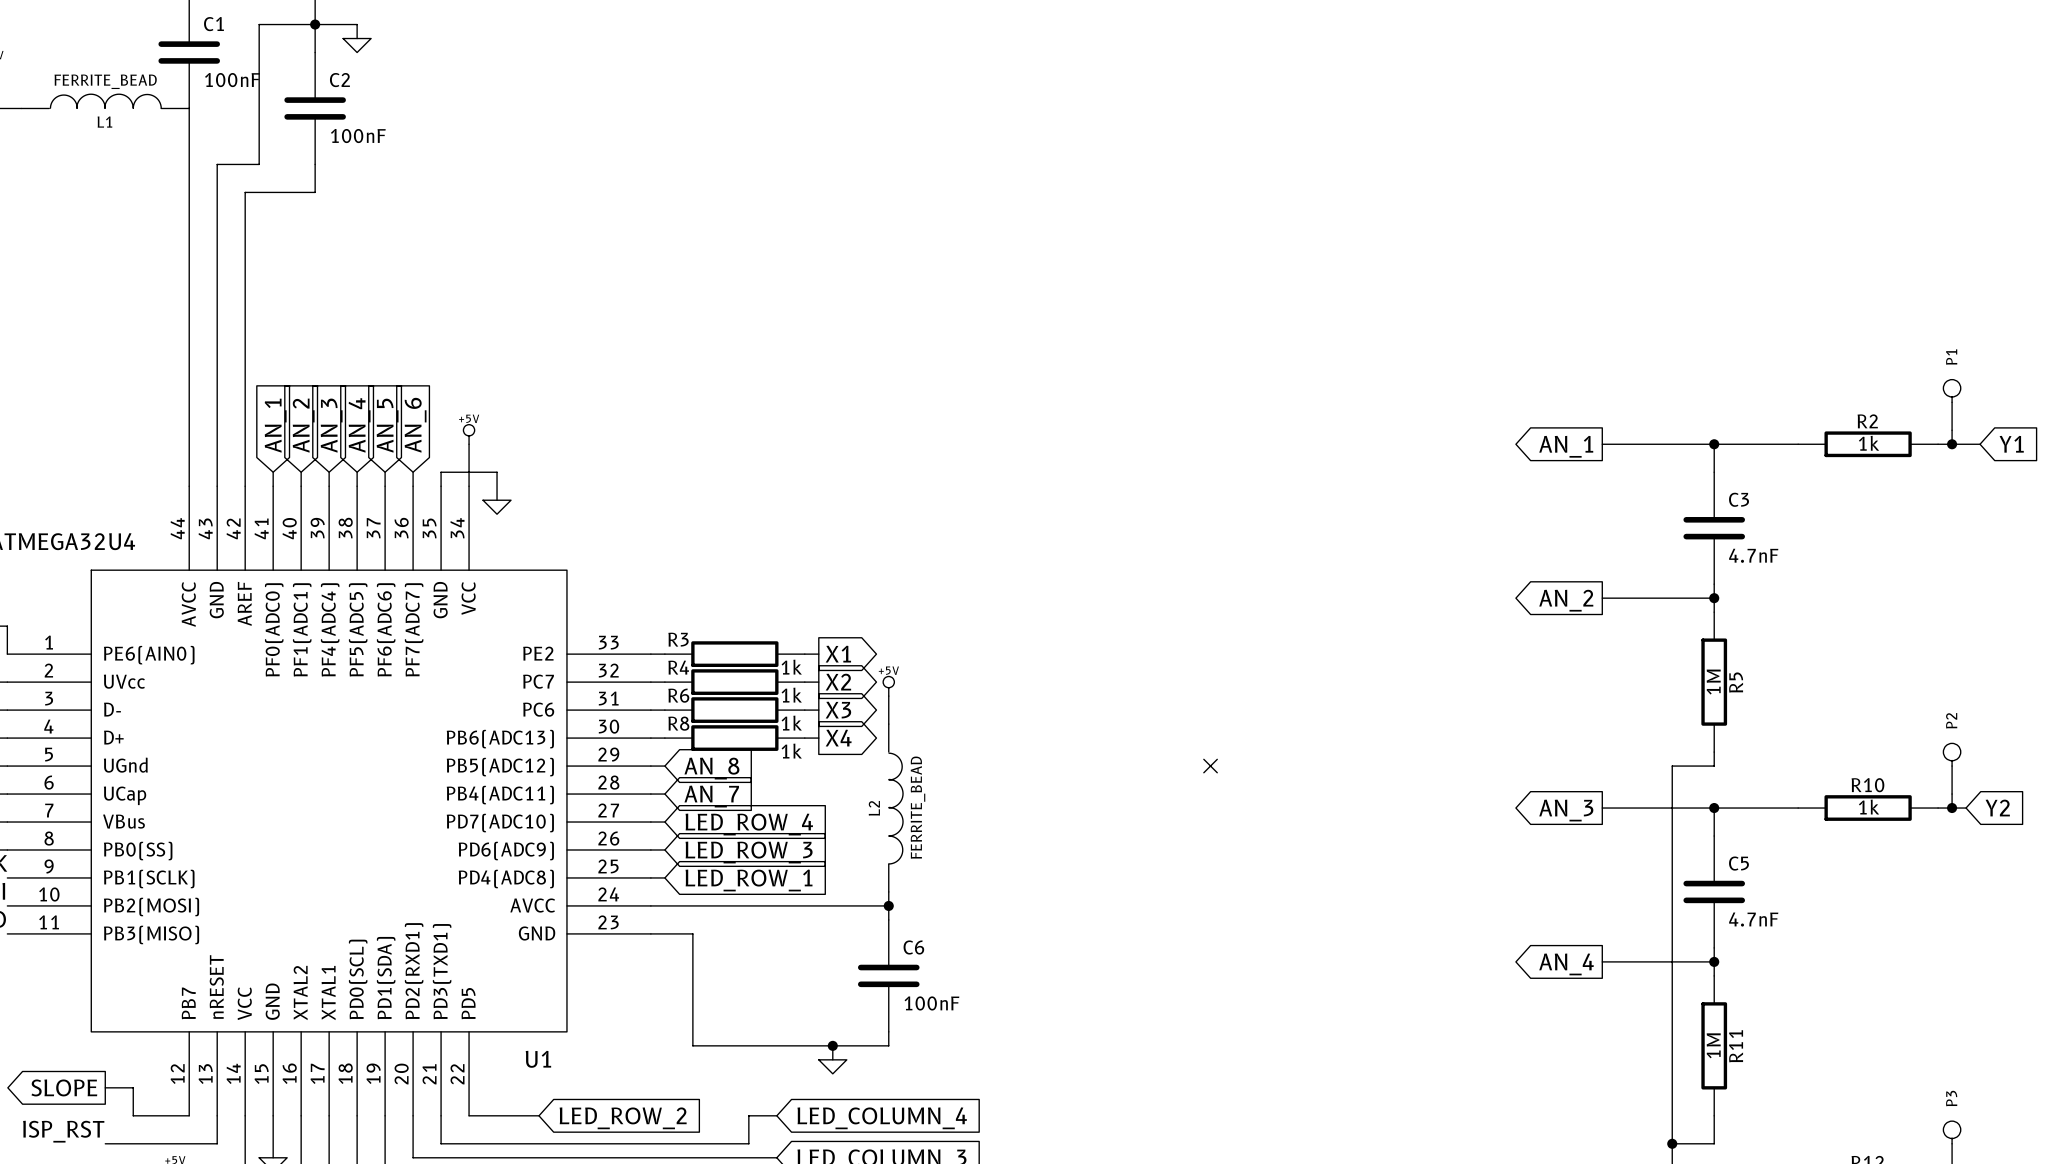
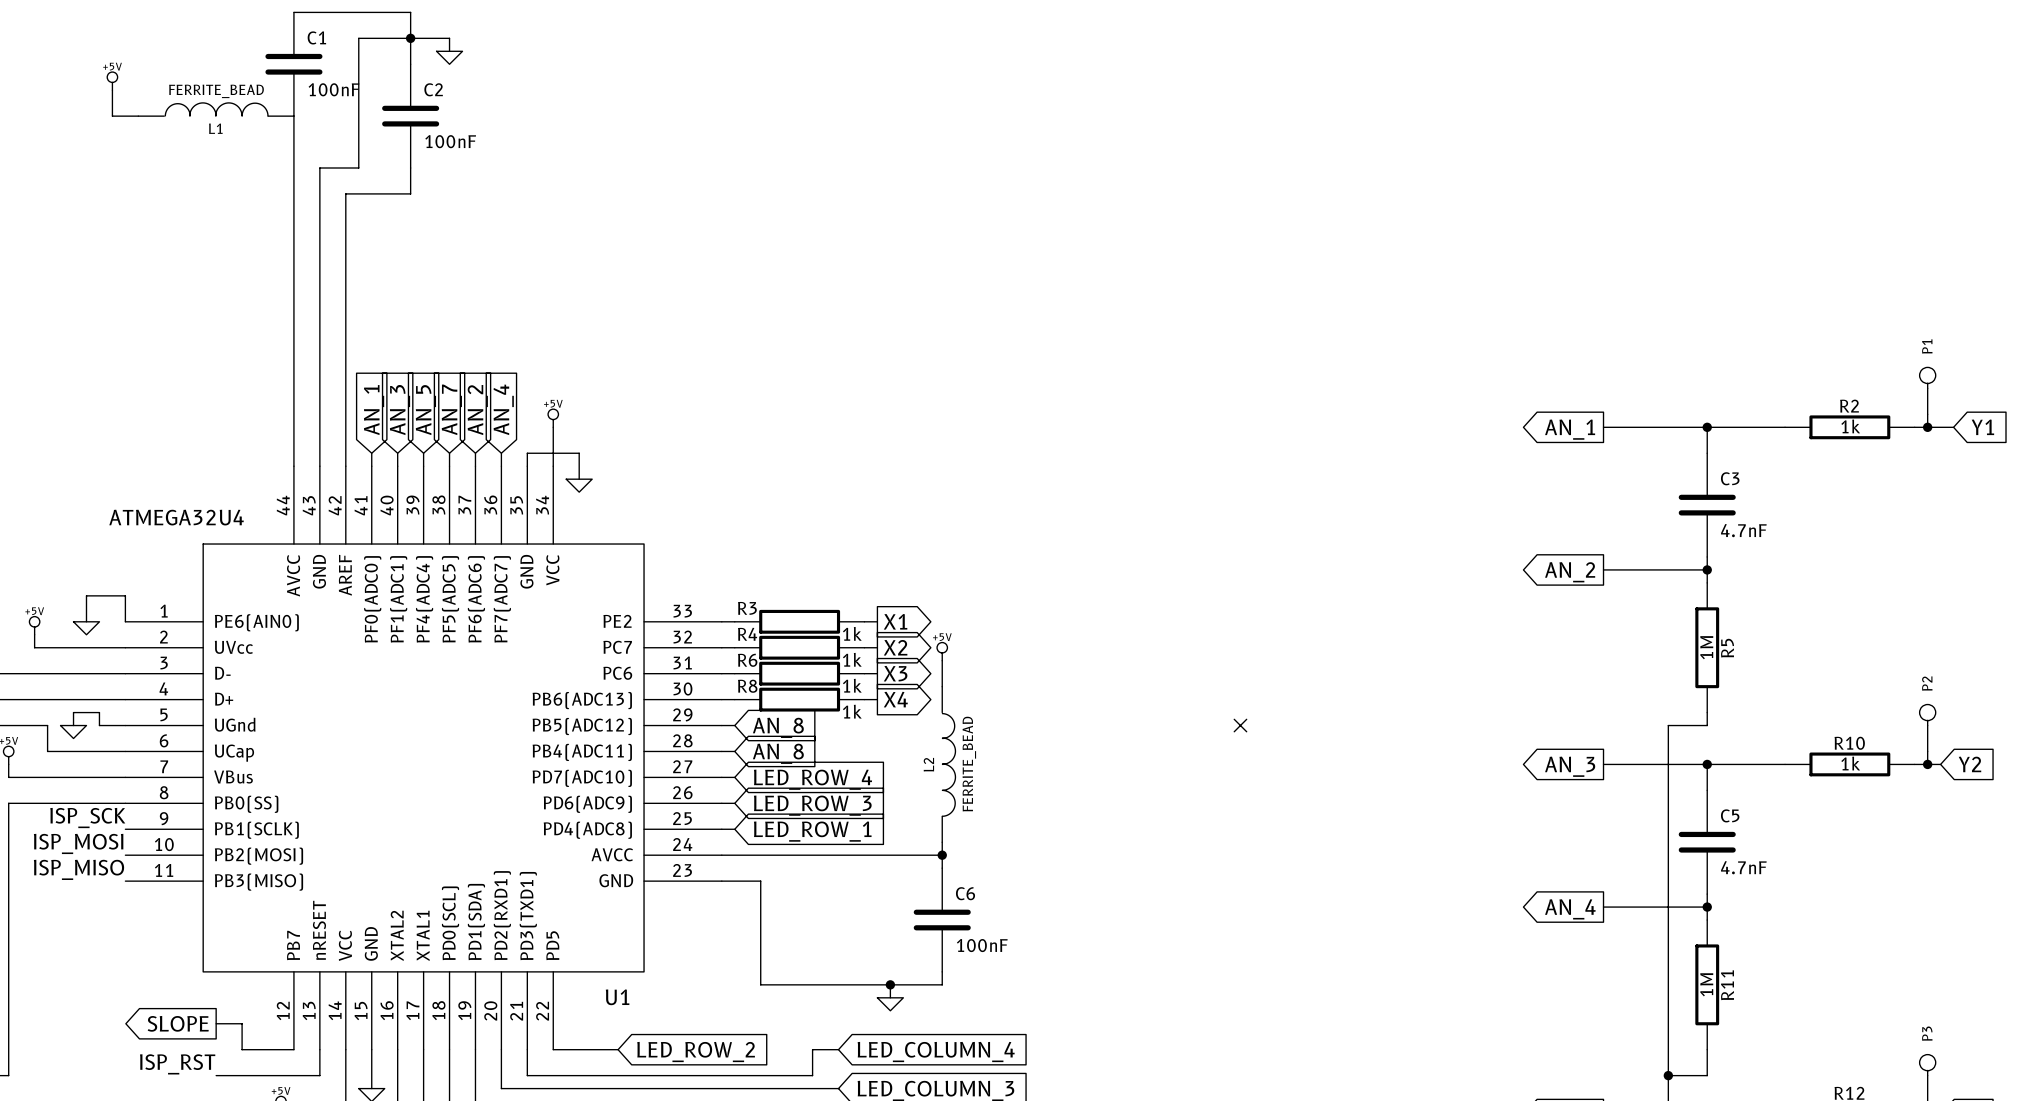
global label: AN_2 (303, 425) -> AN_3 (400, 410)
global label: AN_3 (331, 425) -> AN_5 (425, 410)
global label: AN_4 (359, 425) -> AN_7 (451, 409)
global label: AN_5 (387, 425) -> AN_2 (477, 410)
global label: AN_6 (415, 425) -> AN_4 (503, 409)
global label: AN_7 (711, 796) -> AN_8 (778, 753)

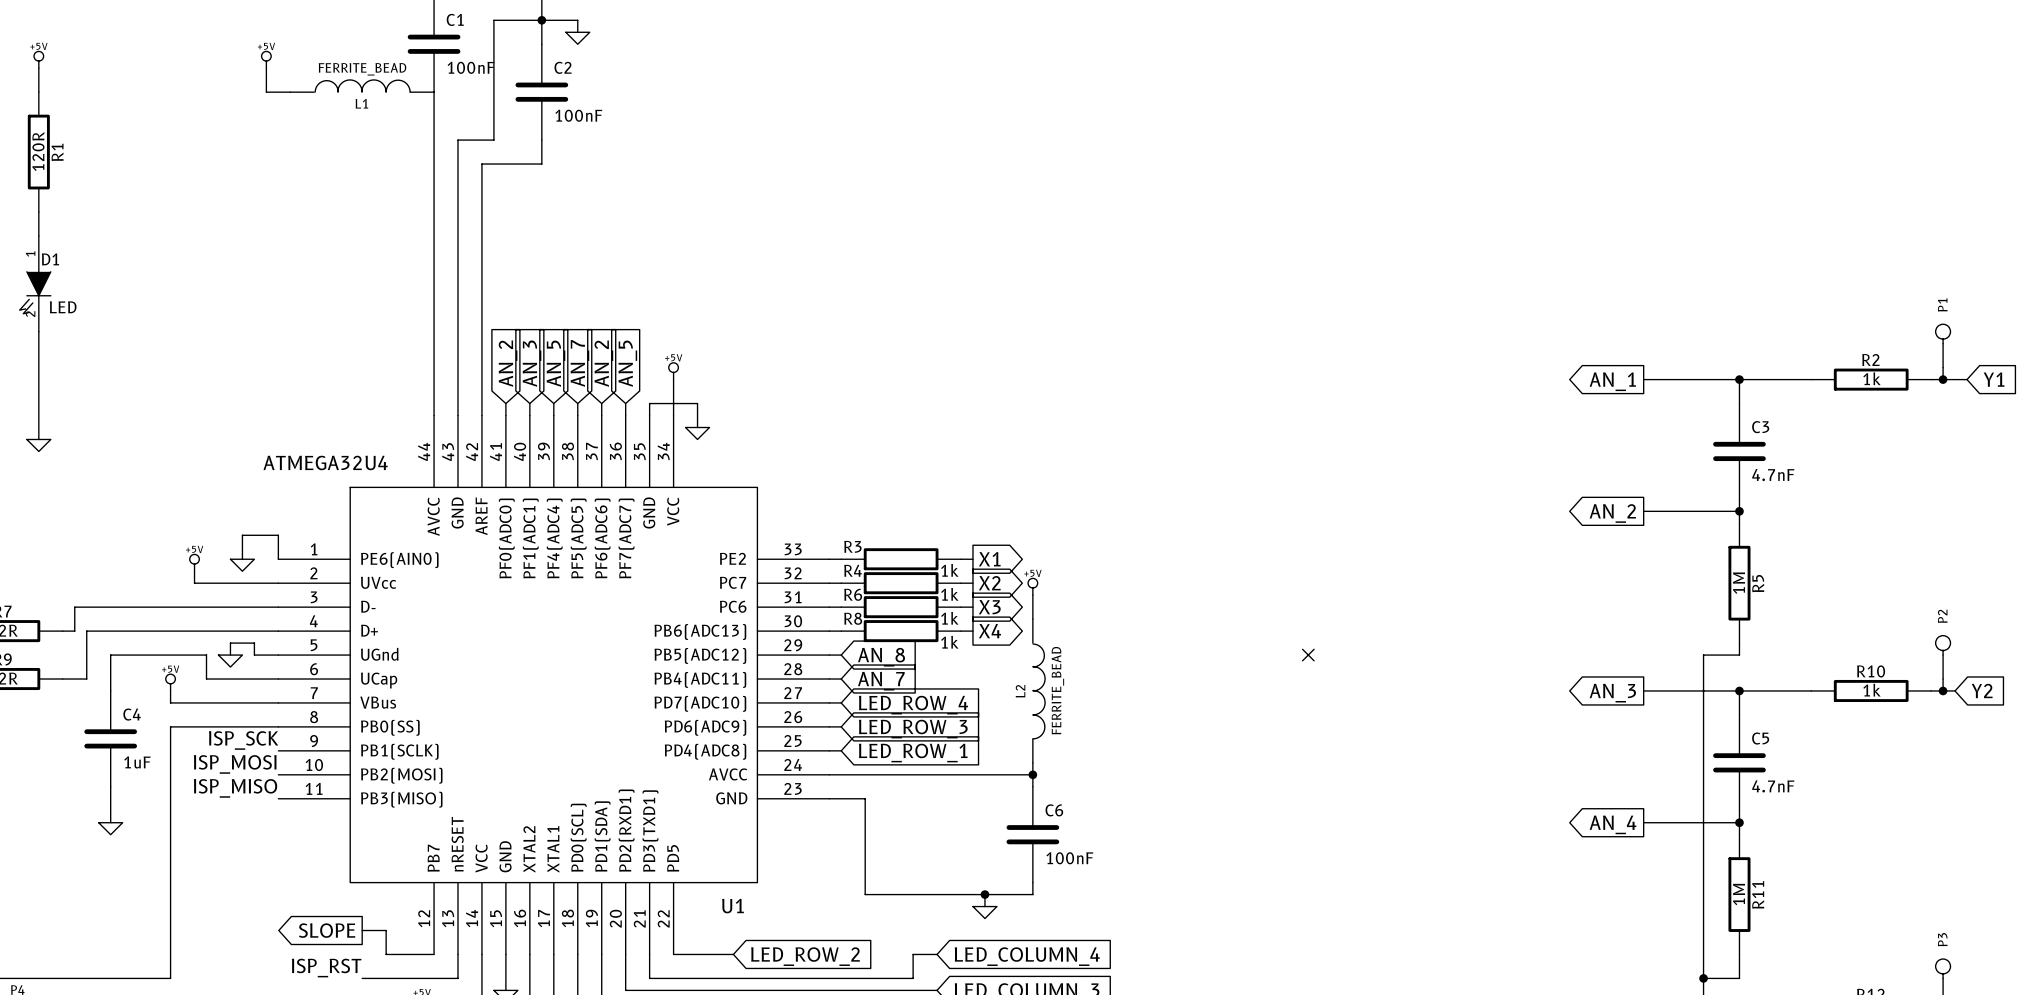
global label: AN_4 (503, 409) -> AN_5 (627, 363)
global label: AN_1 (374, 410) -> AN_2 (508, 363)
global label: AN_8 (778, 753) -> AN_7 (881, 681)

